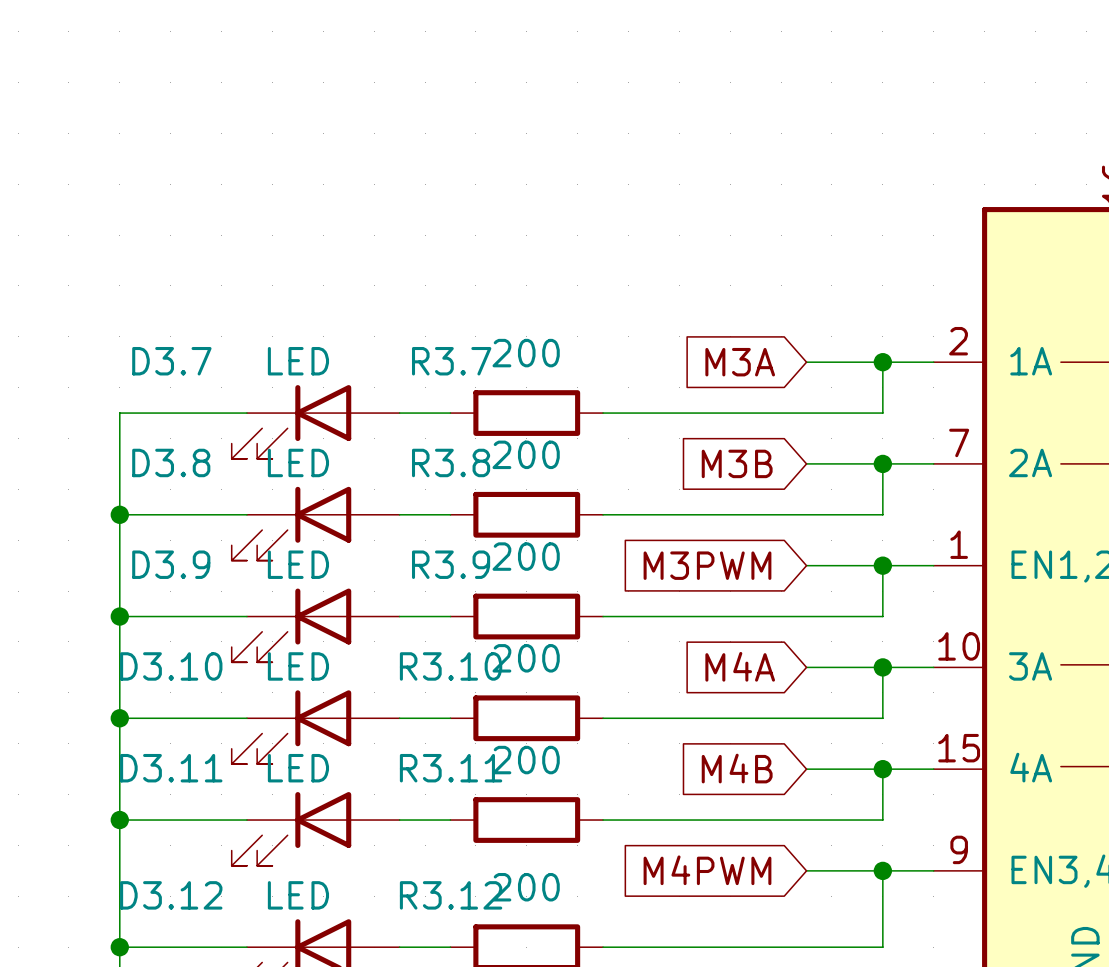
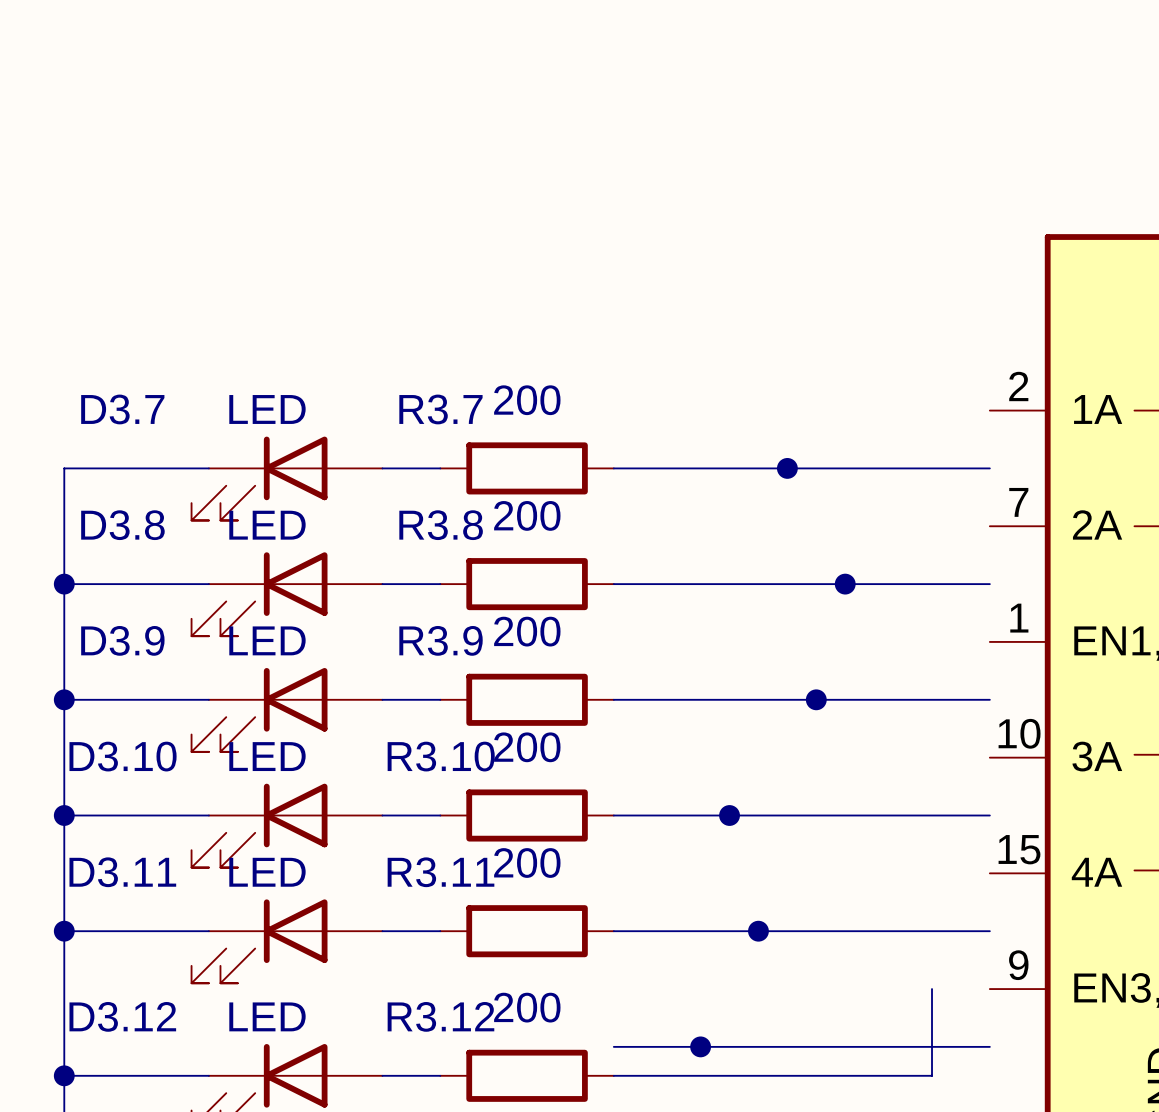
global label: M3A (740, 362) -> none
wire: (806, 362) (933, 362) -> none
wire: (882, 362) (882, 413) -> (989, 468) (932, 468)
junction: (882, 362) -> none
junction: none -> (787, 468)
global label: M3B (737, 463) -> none
wire: (806, 463) (933, 463) -> none
wire: (882, 463) (882, 514) -> (989, 584) (932, 584)
junction: (882, 463) -> none
junction: none -> (845, 584)
global label: M3PWM (707, 565) -> none
wire: (806, 565) (933, 565) -> none
wire: (882, 565) (882, 616) -> (989, 699) (932, 699)
junction: (882, 565) -> none
junction: none -> (816, 699)
global label: M4A (740, 666) -> none
wire: (806, 667) (933, 667) -> none
wire: (882, 667) (882, 718) -> (989, 815) (932, 815)
junction: (882, 667) -> none
junction: none -> (729, 815)
global label: M4B (737, 768) -> none
wire: (806, 769) (933, 769) -> none
wire: (882, 769) (882, 820) -> (989, 931) (932, 931)
junction: (882, 769) -> none
junction: none -> (758, 931)
global label: M4PWM (707, 870) -> none
wire: (806, 870) (933, 870) -> none
junction: (882, 870) -> none
wire: none -> (613, 1046) (989, 1046)
junction: none -> (700, 1046)

